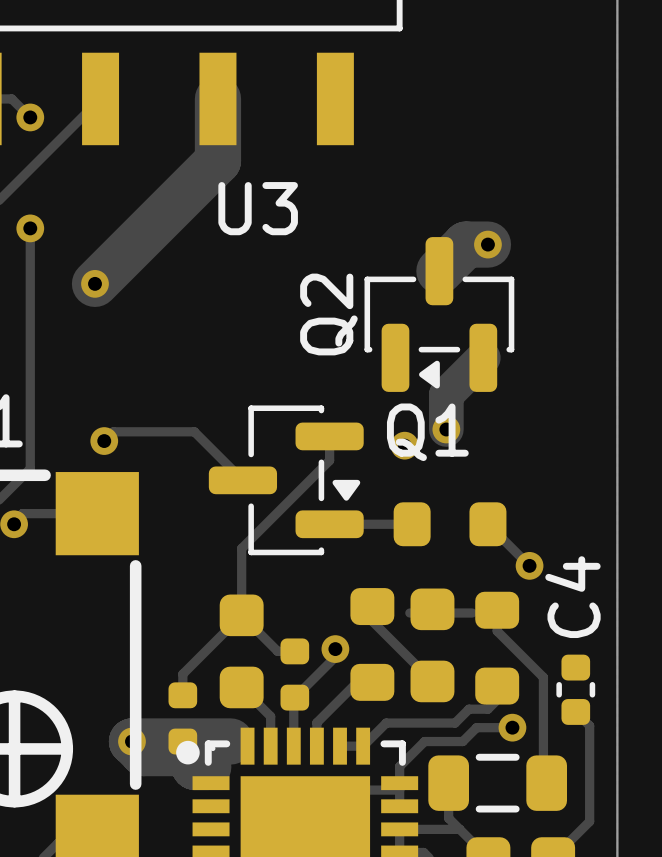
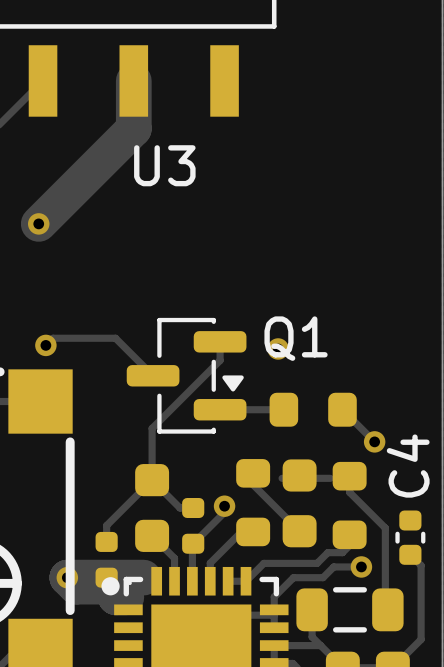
track: (487, 244) (465, 244) (439, 271) -> none
via: (487, 244) -> none
Q2: (439, 314) -> none
track: (483, 357) (446, 394) (446, 429) -> none
via: (446, 429) -> none

